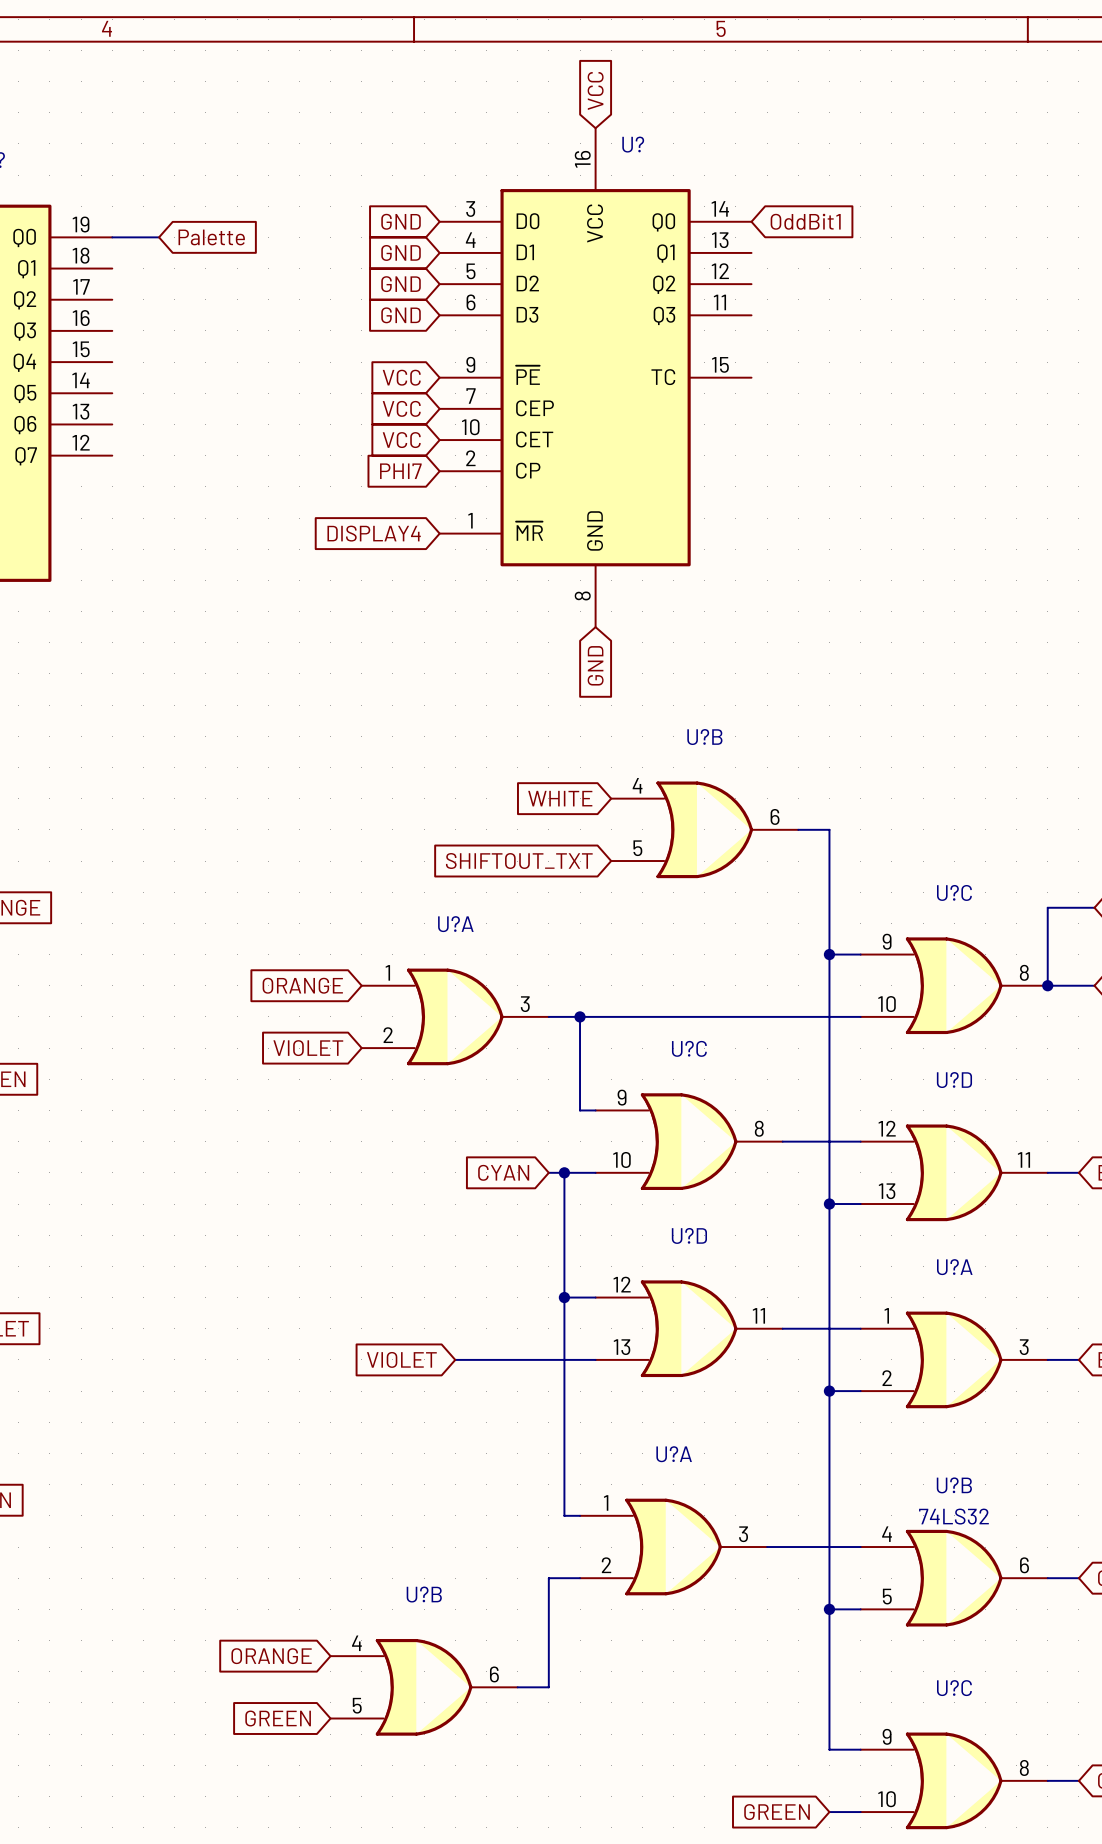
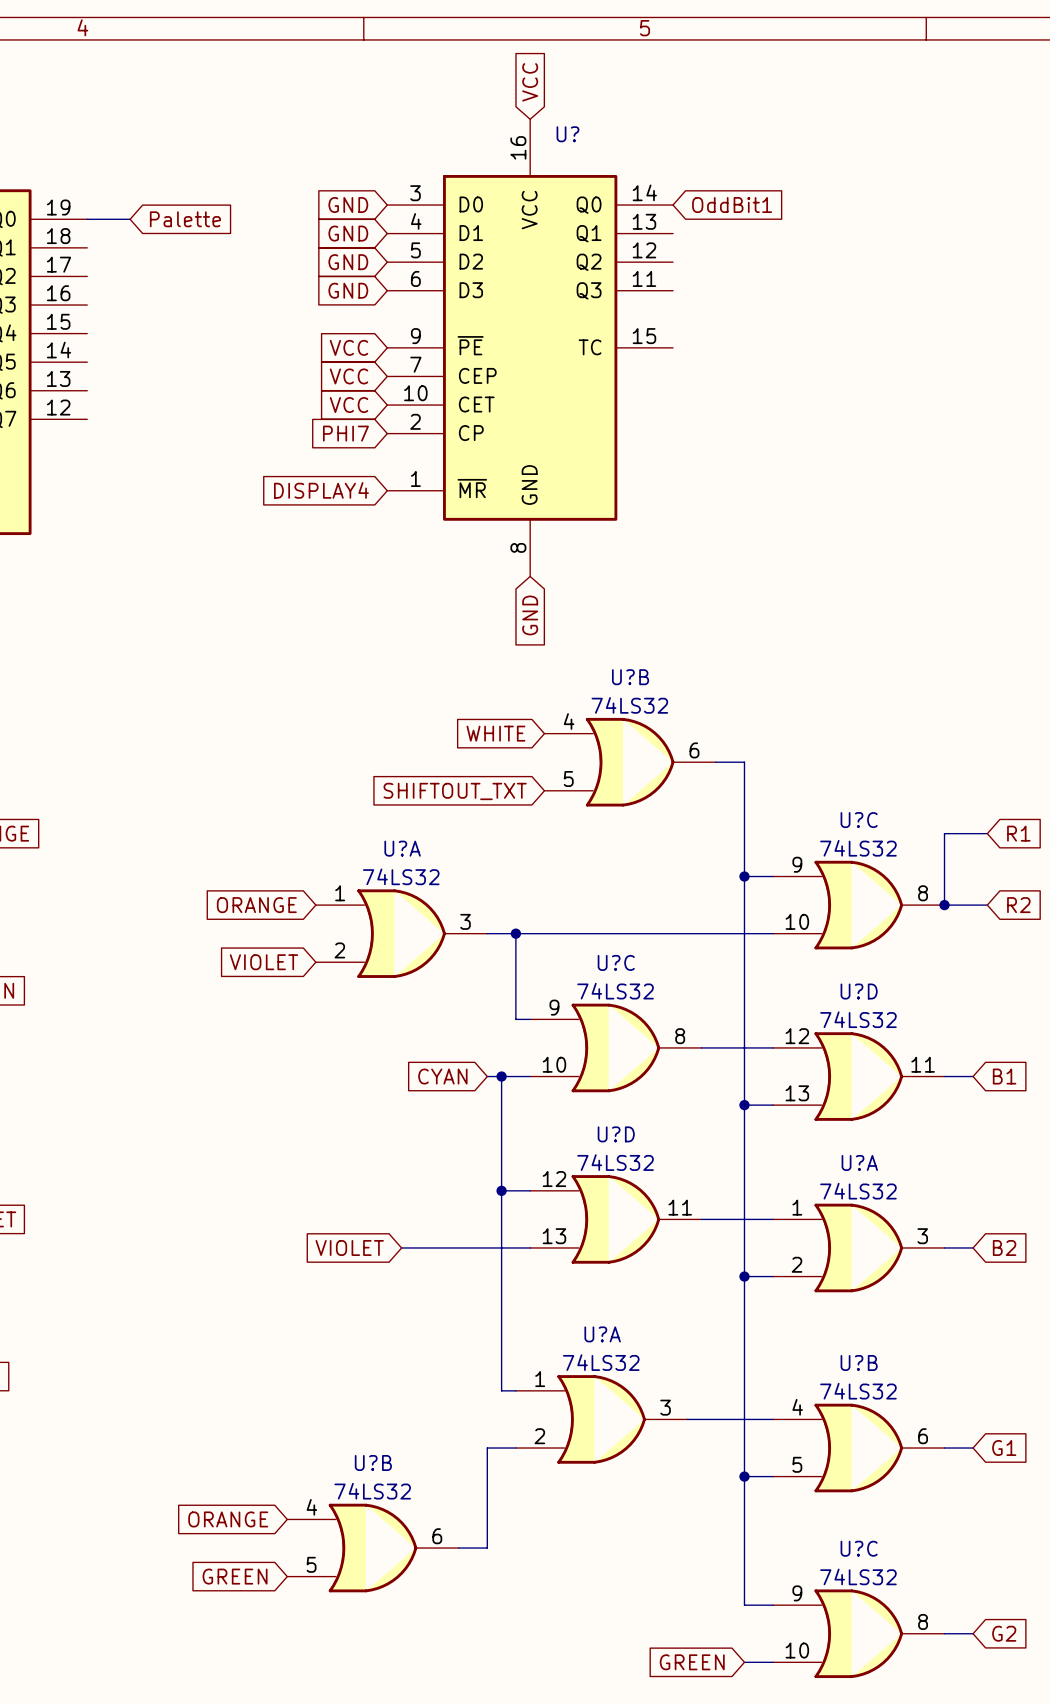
U?B value: none -> 74LS32 (629, 705)
U?C value: none -> 74LS32 (858, 848)
U?A value: none -> 74LS32 (401, 876)
U?C value: none -> 74LS32 (615, 991)
U?D value: none -> 74LS32 (858, 1019)
U?D value: none -> 74LS32 (615, 1162)
U?A value: none -> 74LS32 (858, 1191)
U?A value: none -> 74LS32 (601, 1362)
U?B value: none -> 74LS32 (372, 1491)
U?C value: none -> 74LS32 (858, 1576)

